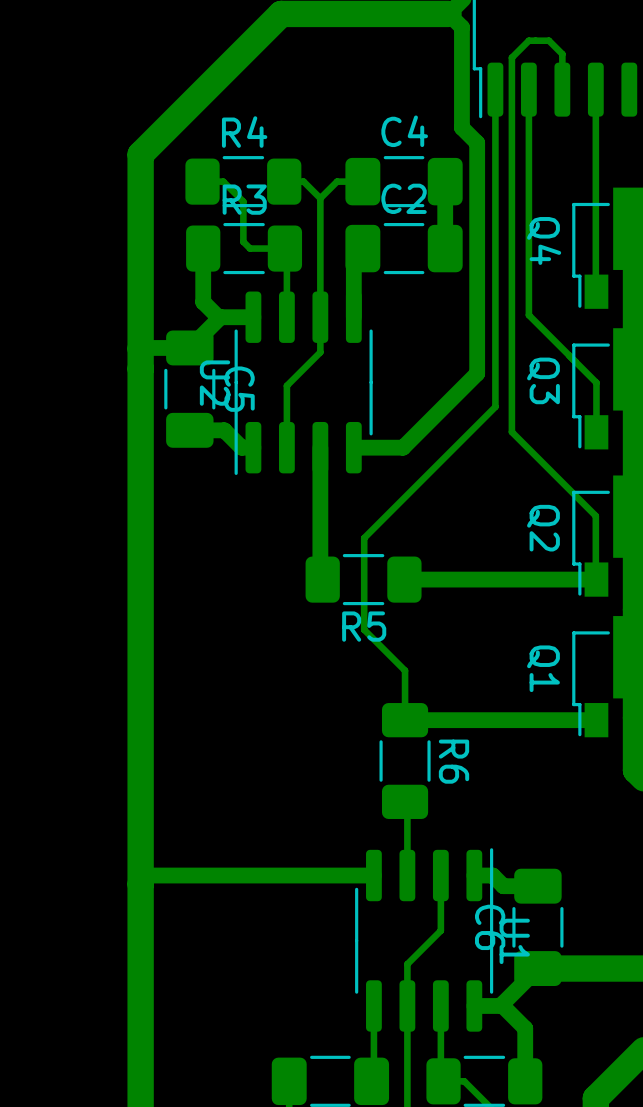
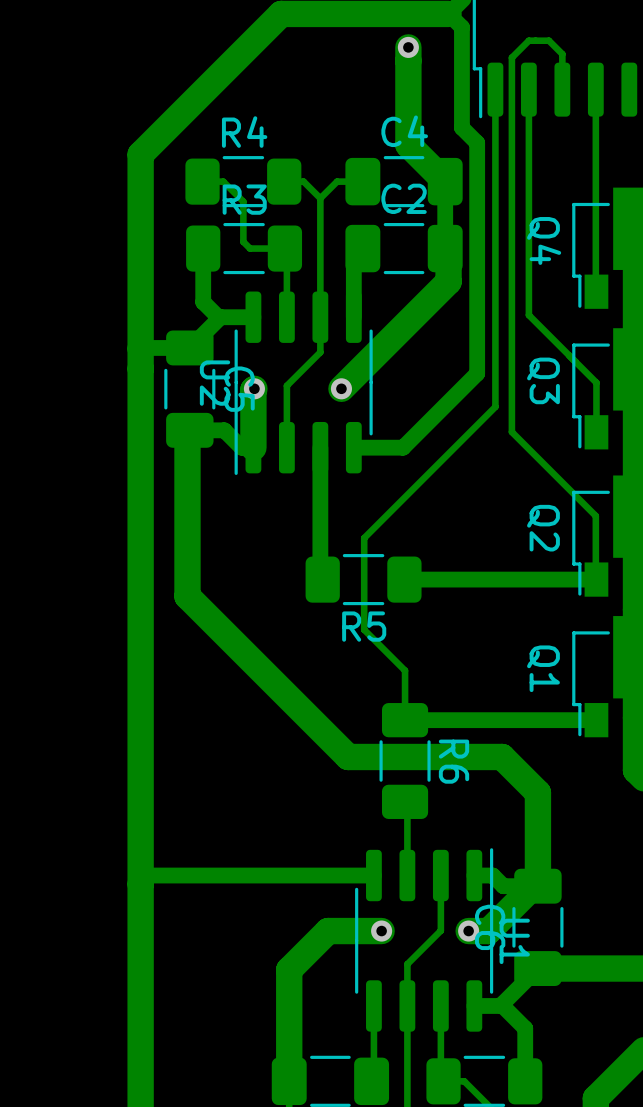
track: none -> (408, 47) (408, 144) (445, 181)
via: none -> (408, 47)
track: none -> (441, 254) (448, 261) (448, 281) (341, 388)
track: none -> (254, 388) (253, 447)
via: none -> (254, 388)
via: none -> (341, 388)
track: none -> (187, 428) (187, 596) (348, 756) (502, 756) (537, 792) (537, 886)
track: none -> (528, 890) (488, 931) (468, 931)
track: none -> (381, 931) (328, 931) (289, 969) (289, 1081)
via: none -> (381, 931)
via: none -> (468, 931)

